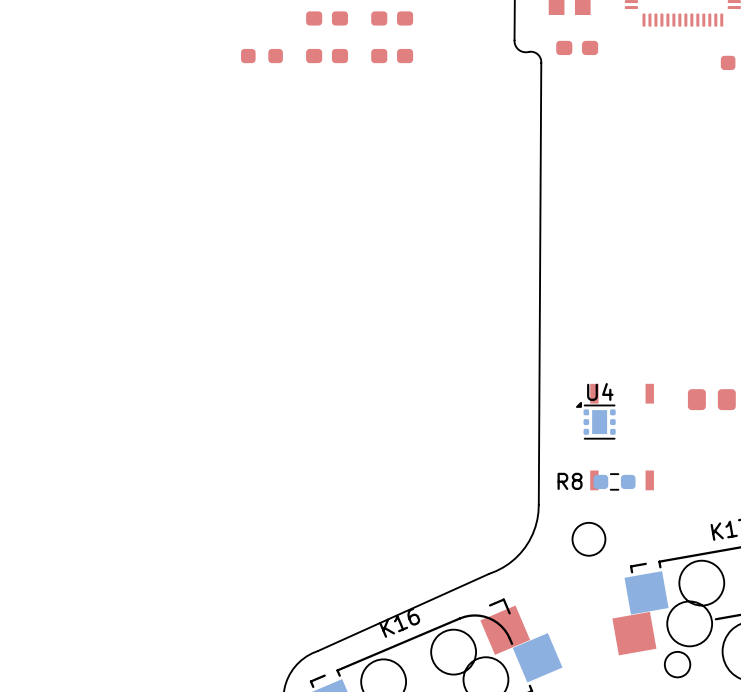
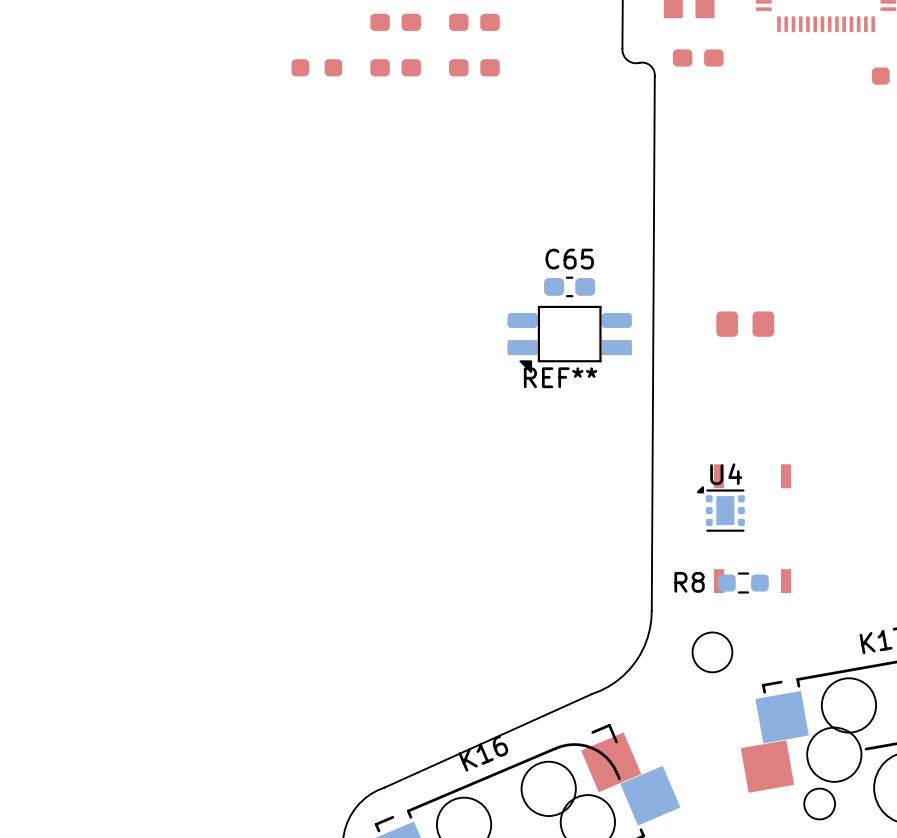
C65: none -> (569, 286)
part: none -> (569, 339)
part position: (711, 399) -> (745, 324)

